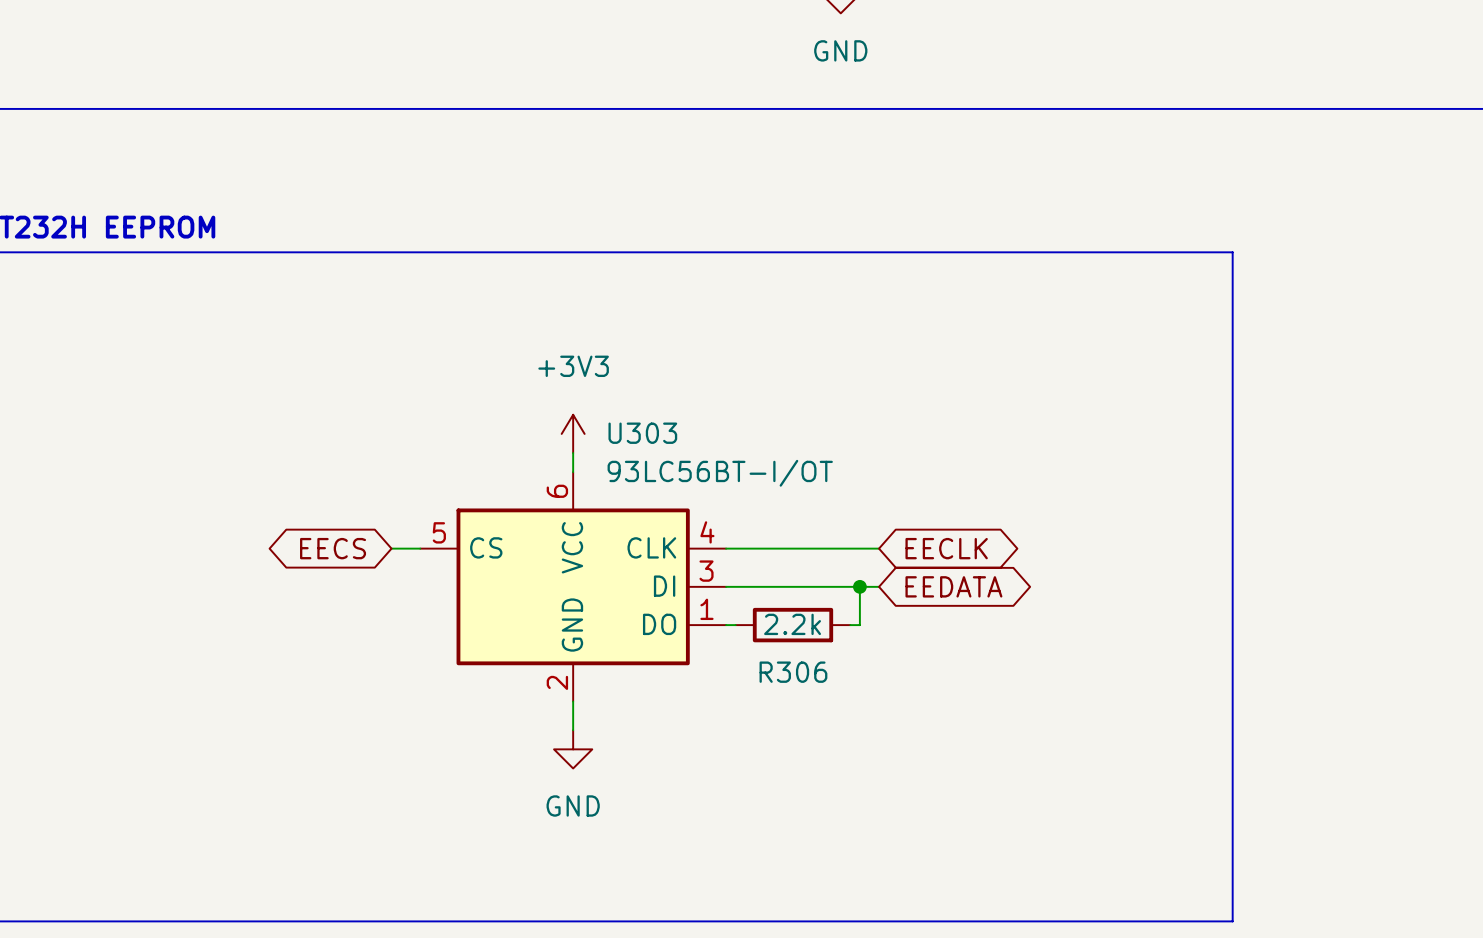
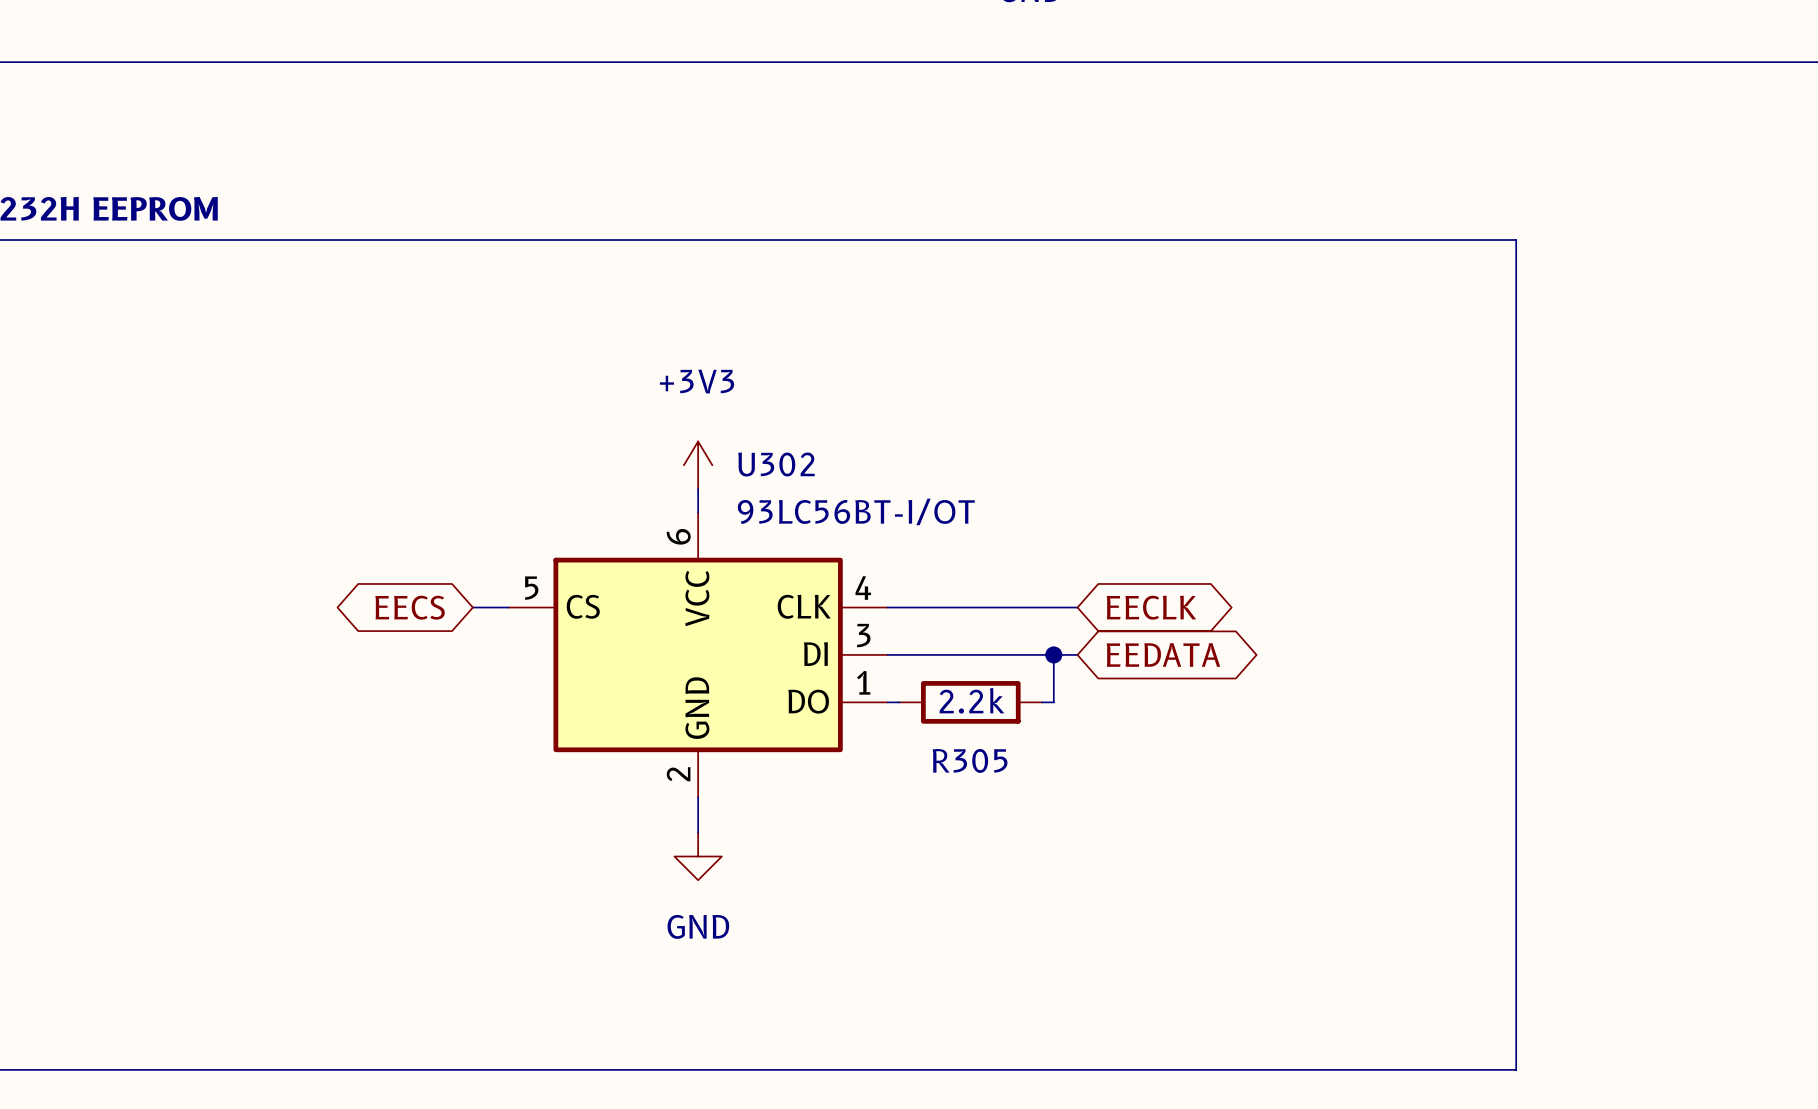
U303 name: U303 (642, 433) -> U302 (776, 464)
R306 name: R306 (793, 672) -> R305 (970, 760)

